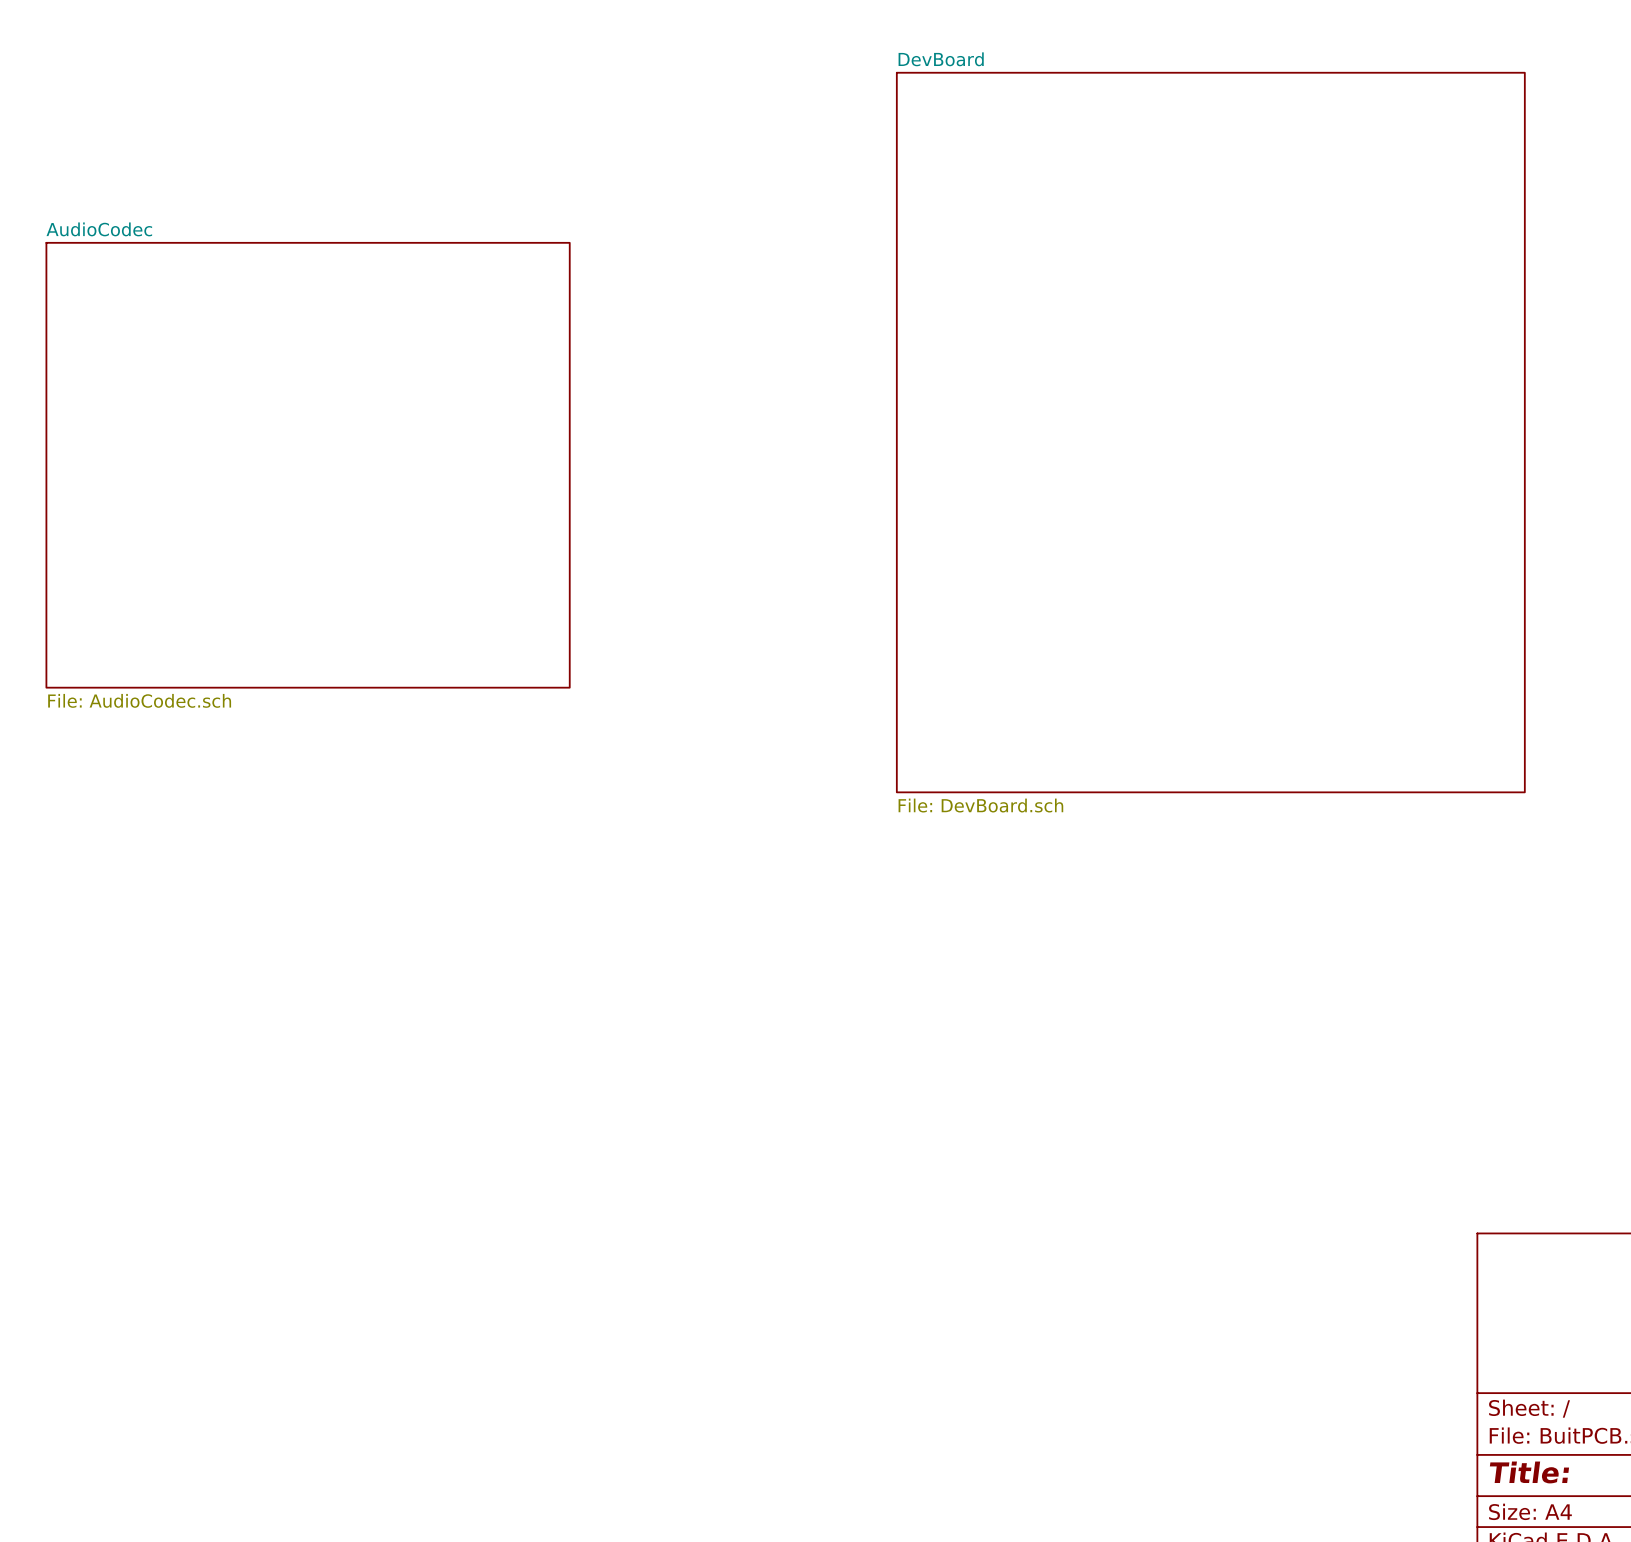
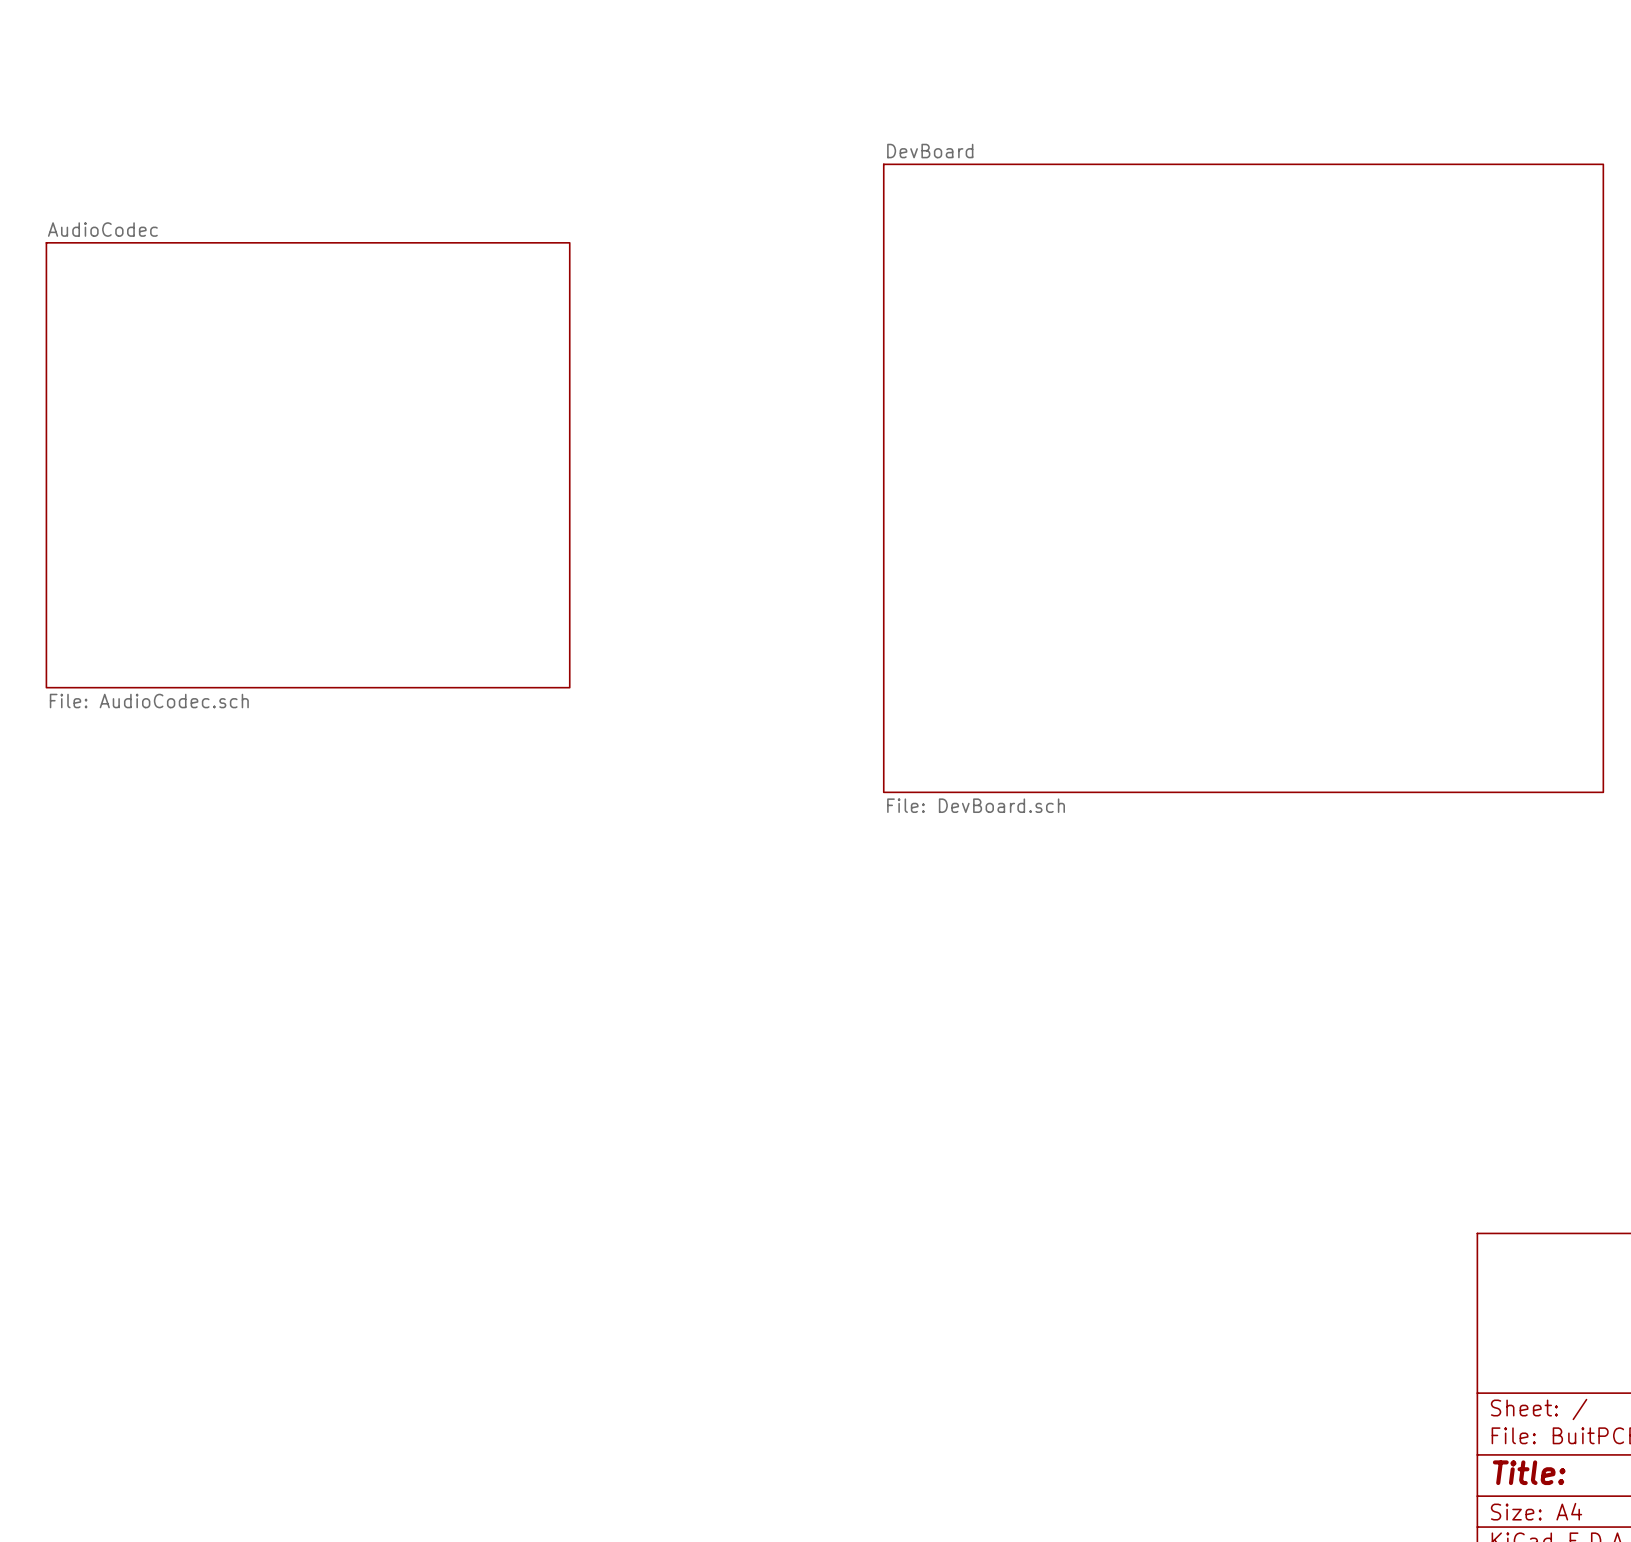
sheet DevBoard name position: DevBoard (941, 59) -> DevBoard (930, 151)
sheet DevBoard rotation: 0° (1210, 432) -> 90° clockwise (1243, 478)
sheet DevBoard value position: File: DevBoard.sch (980, 805) -> File: DevBoard.sch (976, 805)

